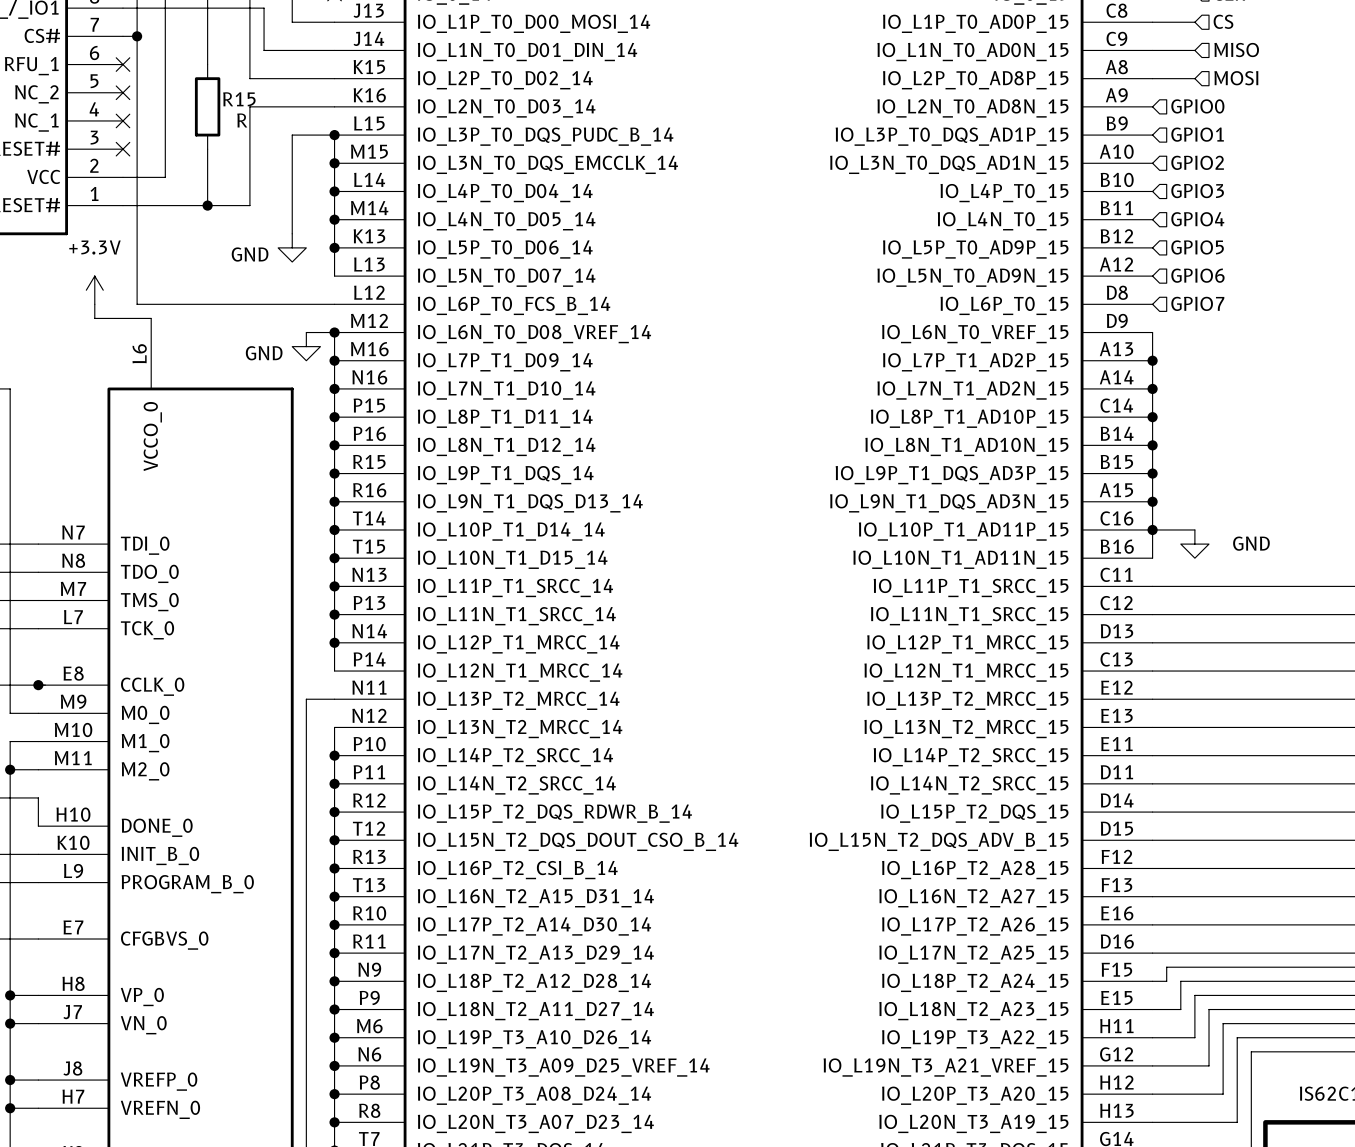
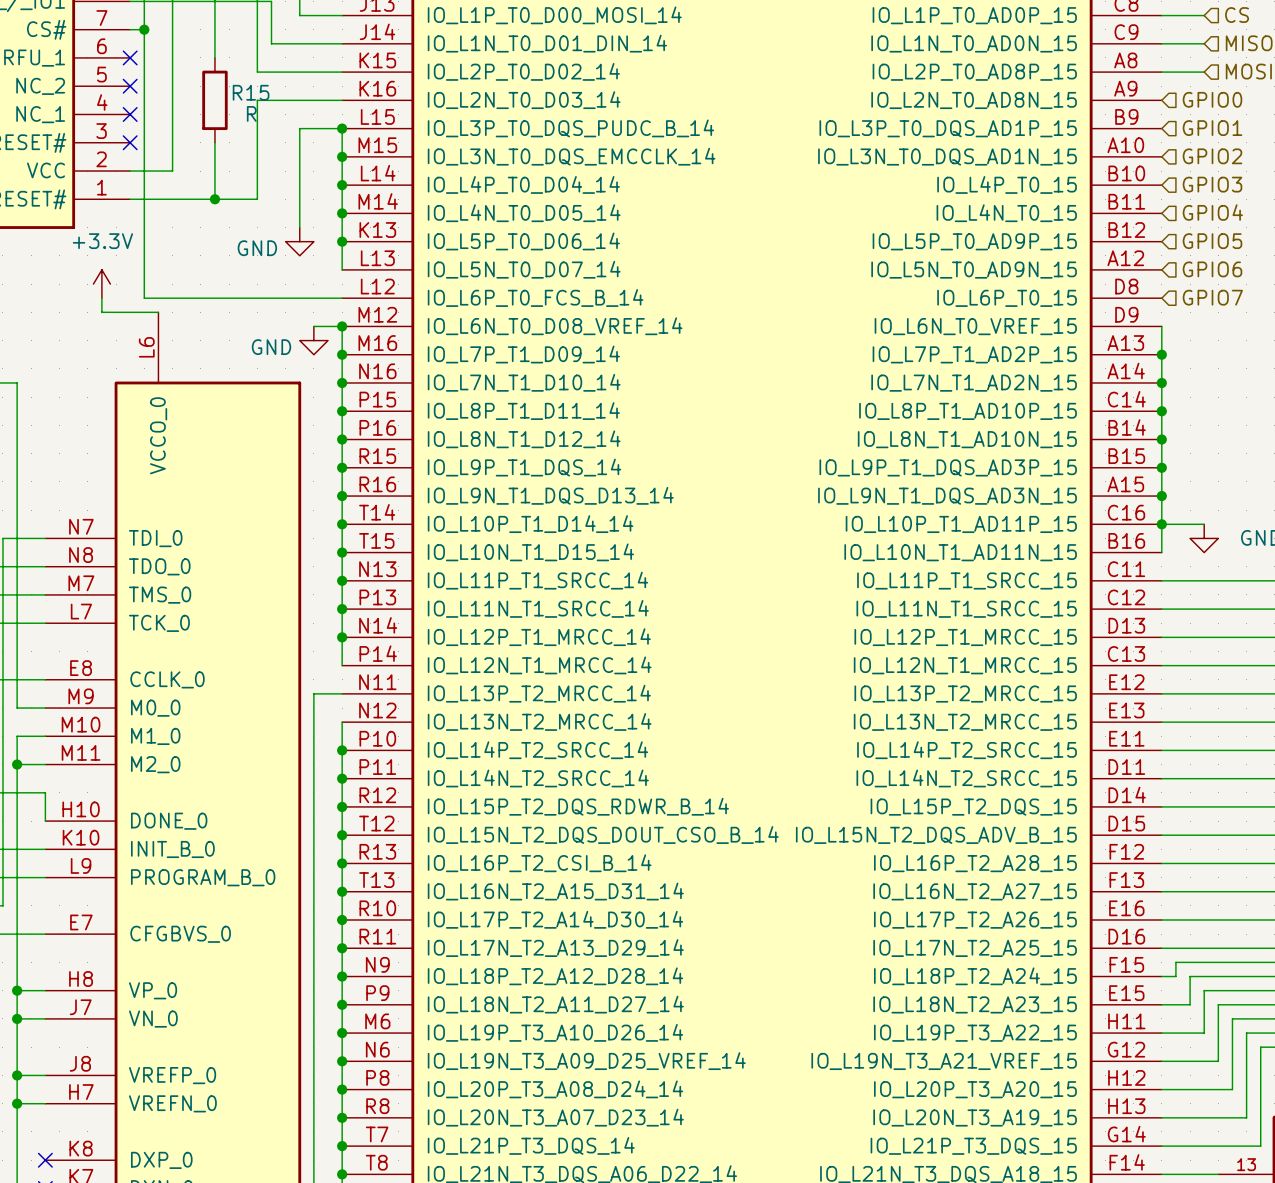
junction: (38, 685) -> none

